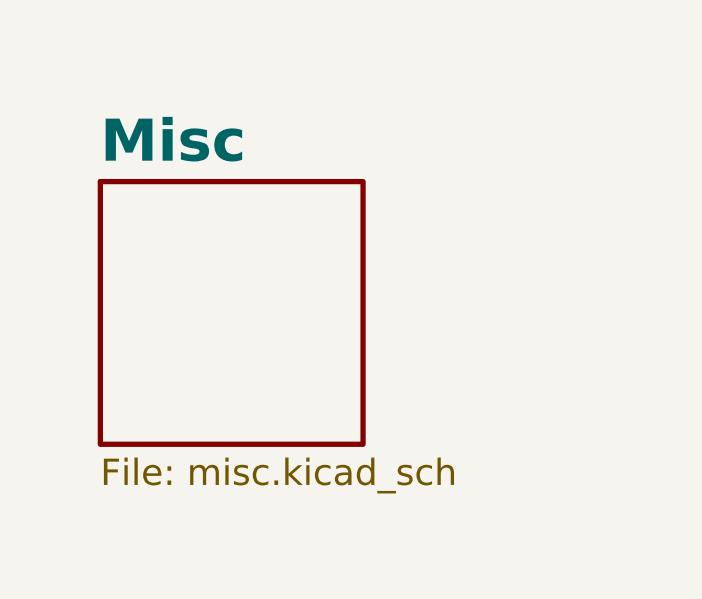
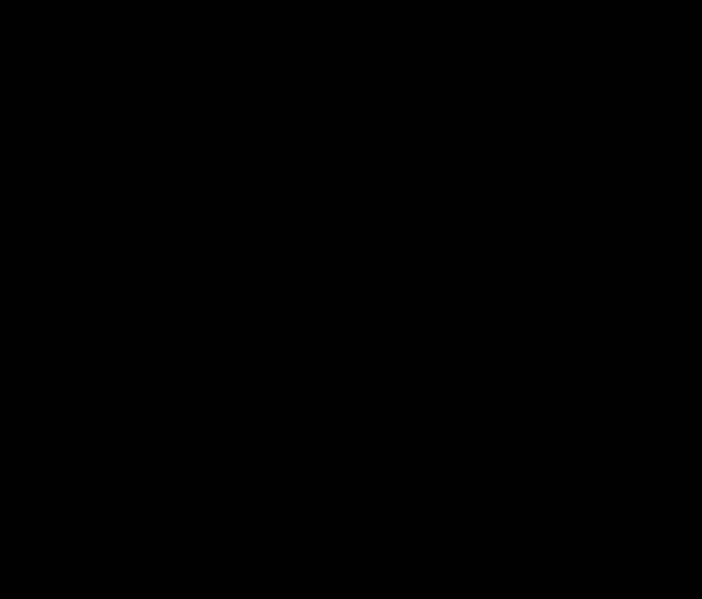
sheet Misc: File: misc.kicad_sch (231, 312) -> none

